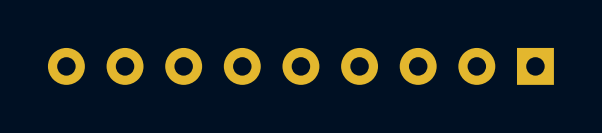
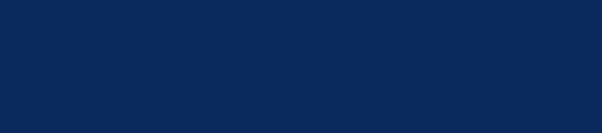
part: (300, 66) -> none

